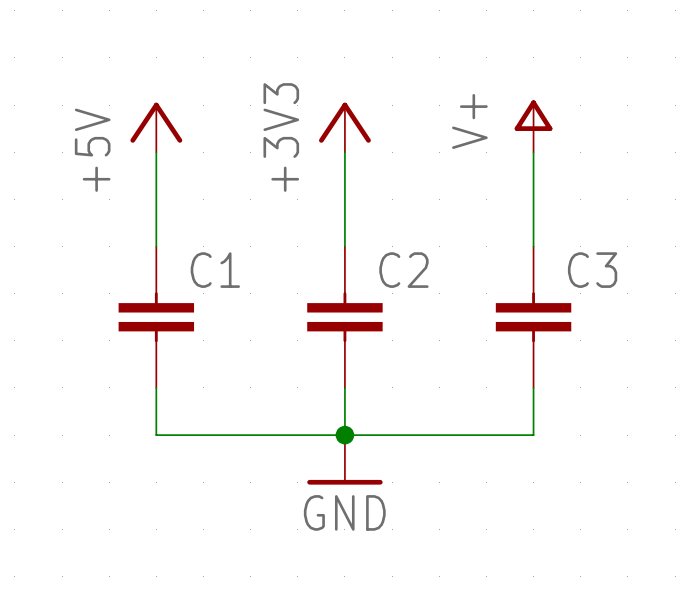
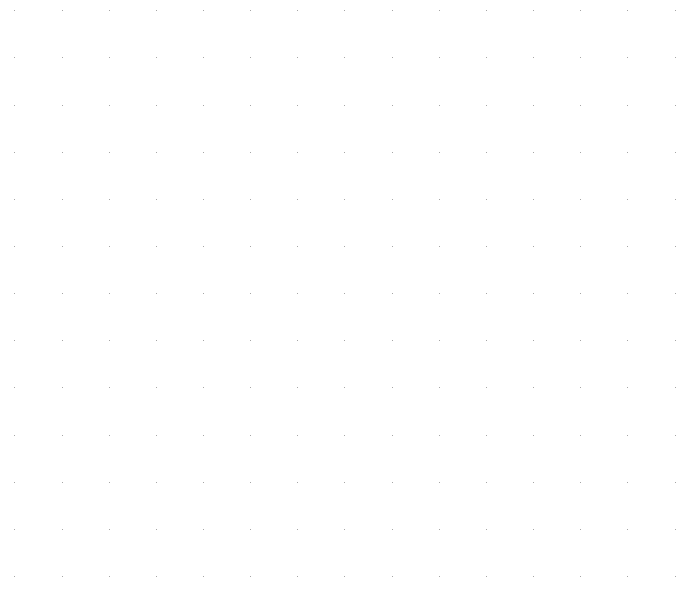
power symbol: V+ (533, 126) -> none
power symbol: +5V (156, 127) -> none
power symbol: +3V3 (344, 127) -> none
wire: (156, 152) (156, 246) -> none
wire: (344, 152) (344, 246) -> none
wire: (533, 152) (533, 246) -> none
C1: (156, 317) -> none
C2: (344, 317) -> none
C3: (533, 317) -> none
wire: (156, 387) (156, 435) (533, 435) (533, 387) -> none
wire: (344, 387) (344, 435) -> none
junction: (344, 435) -> none
power symbol: GND (344, 459) -> none

